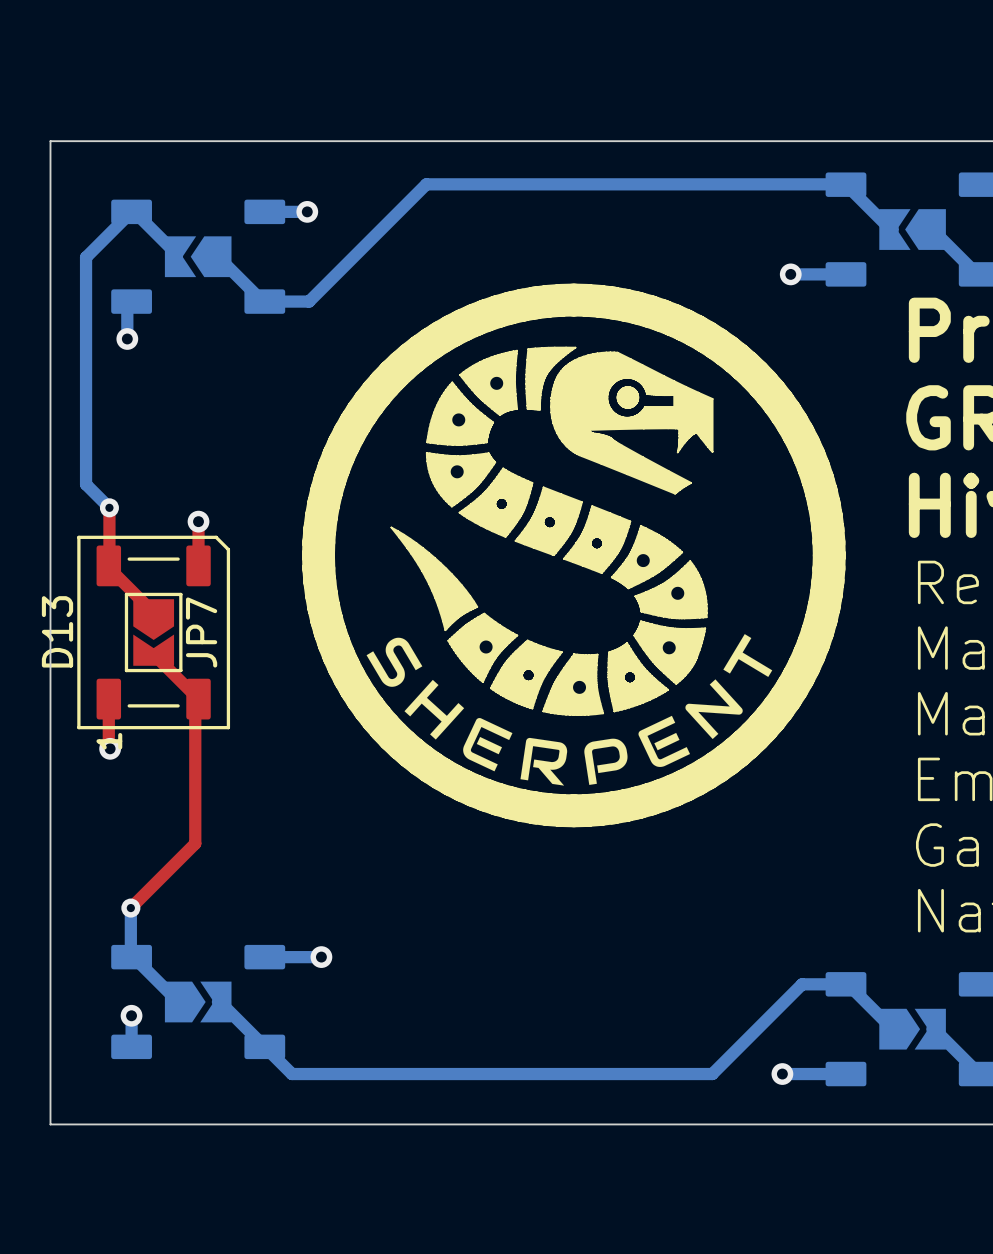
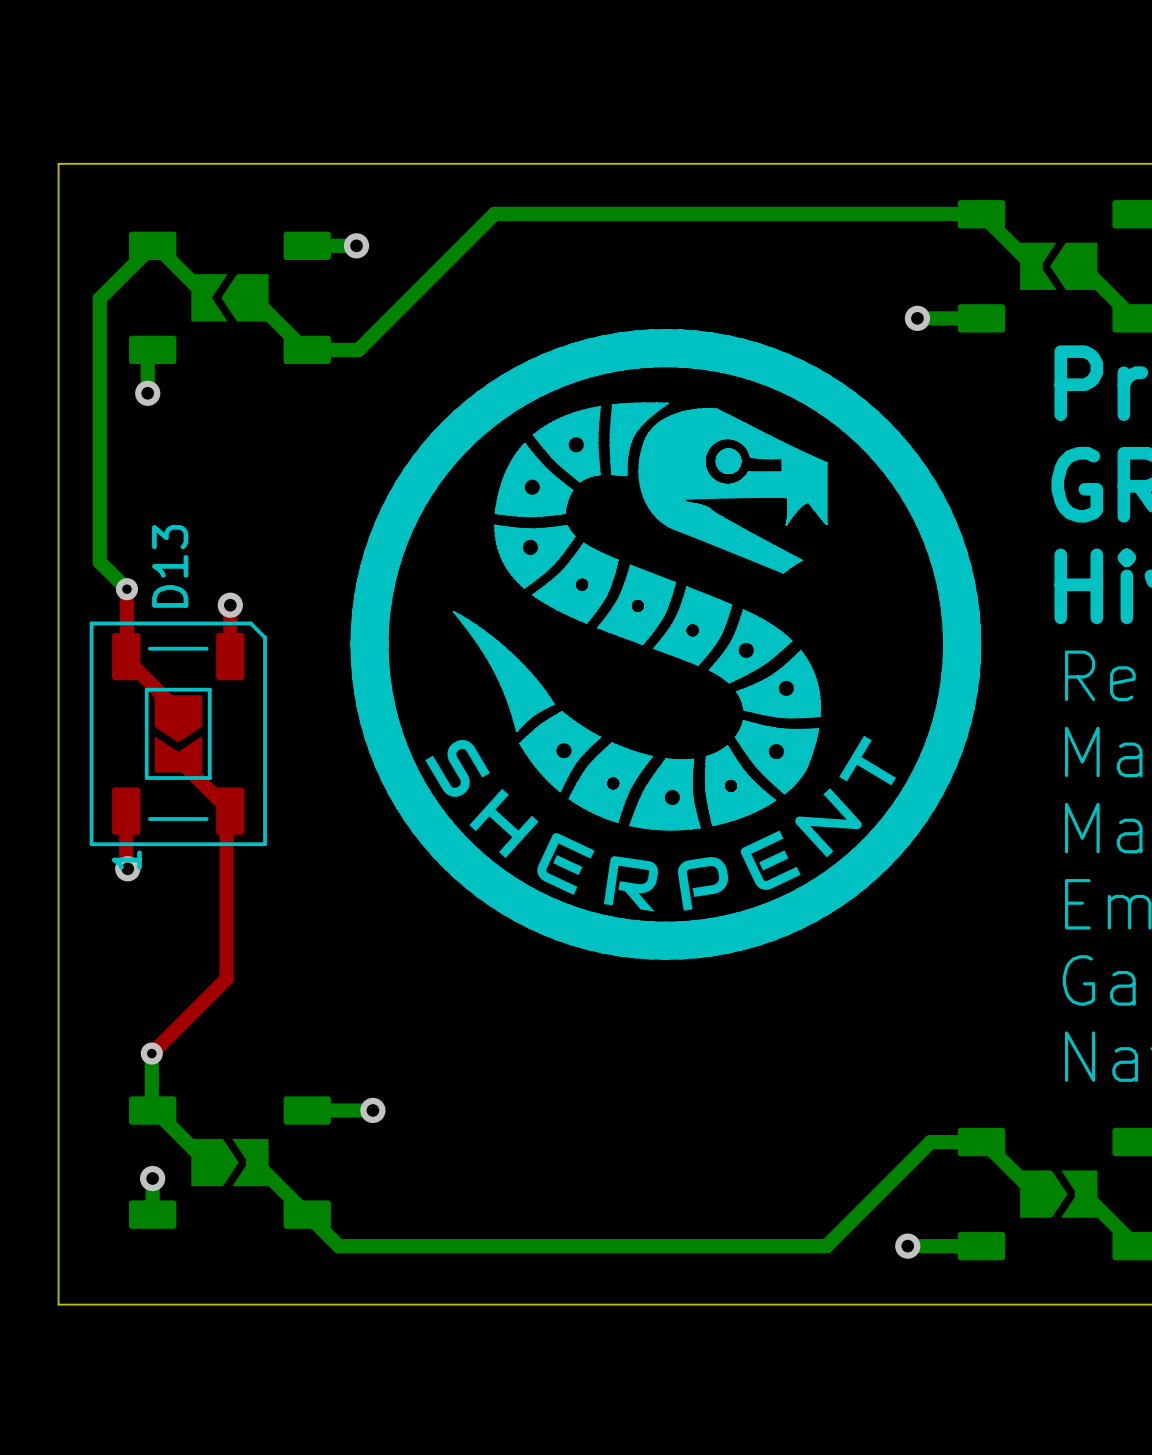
D13 name position: D13 (57, 631) -> D13 (170, 566)
JP7 name: JP7 (201, 632) -> none

